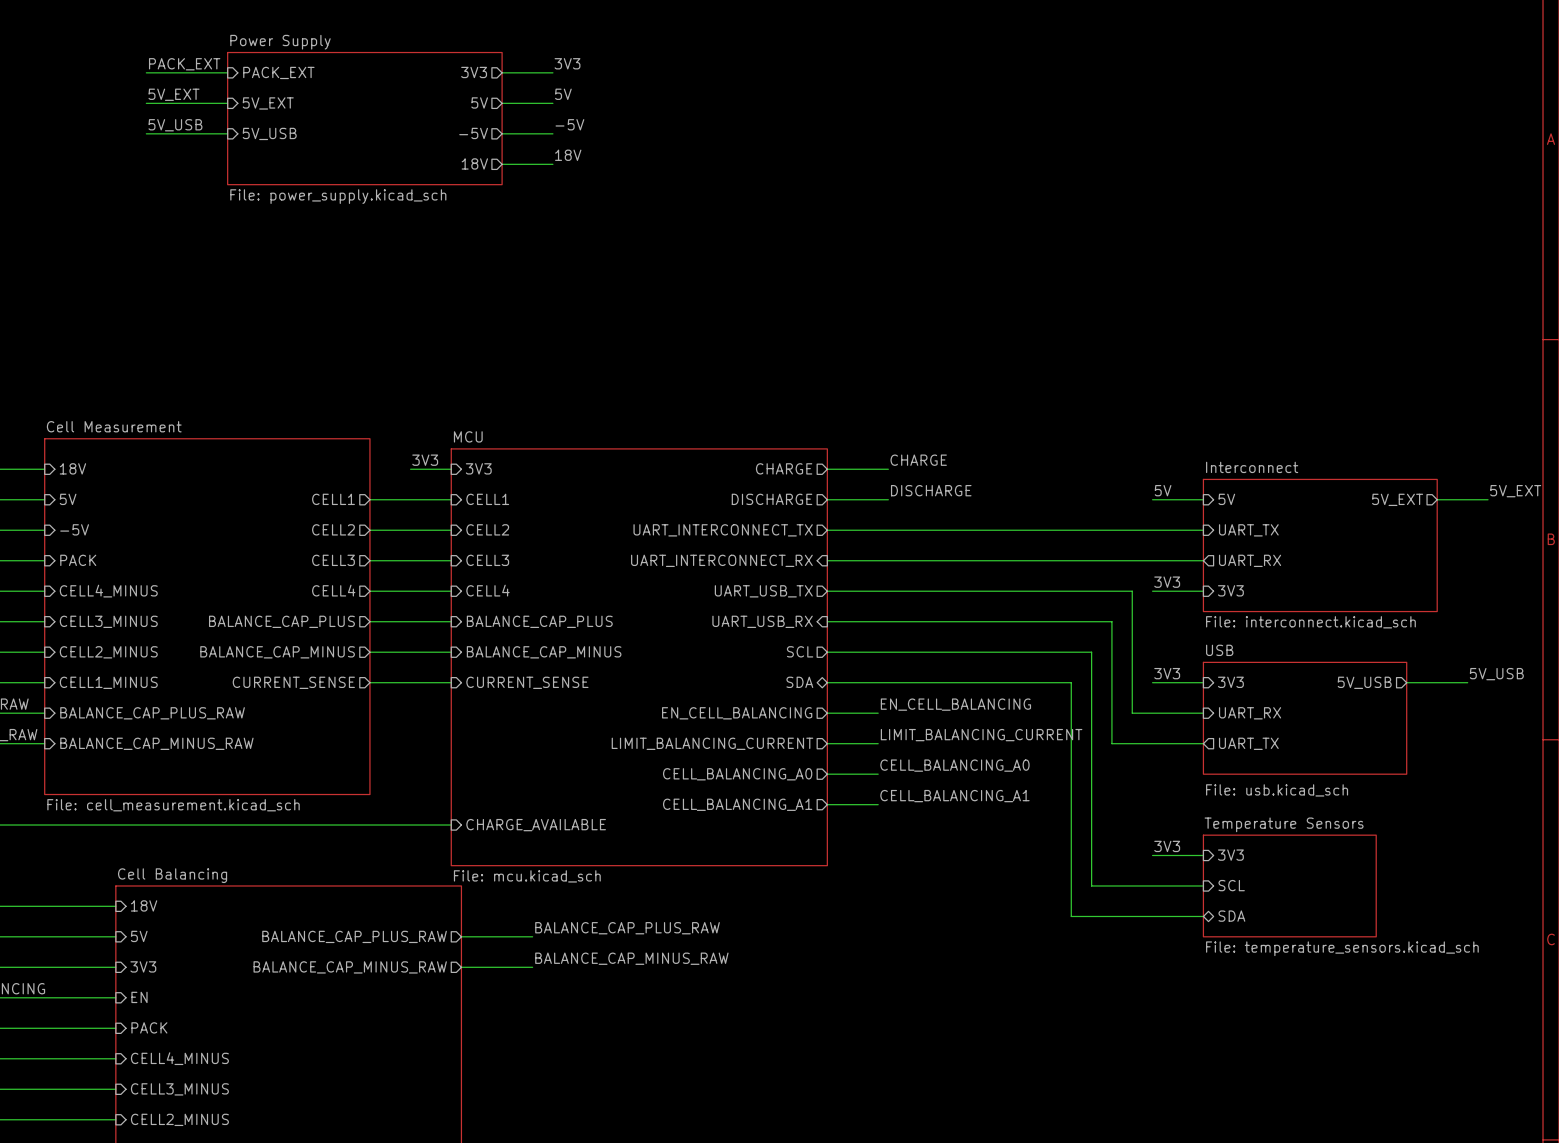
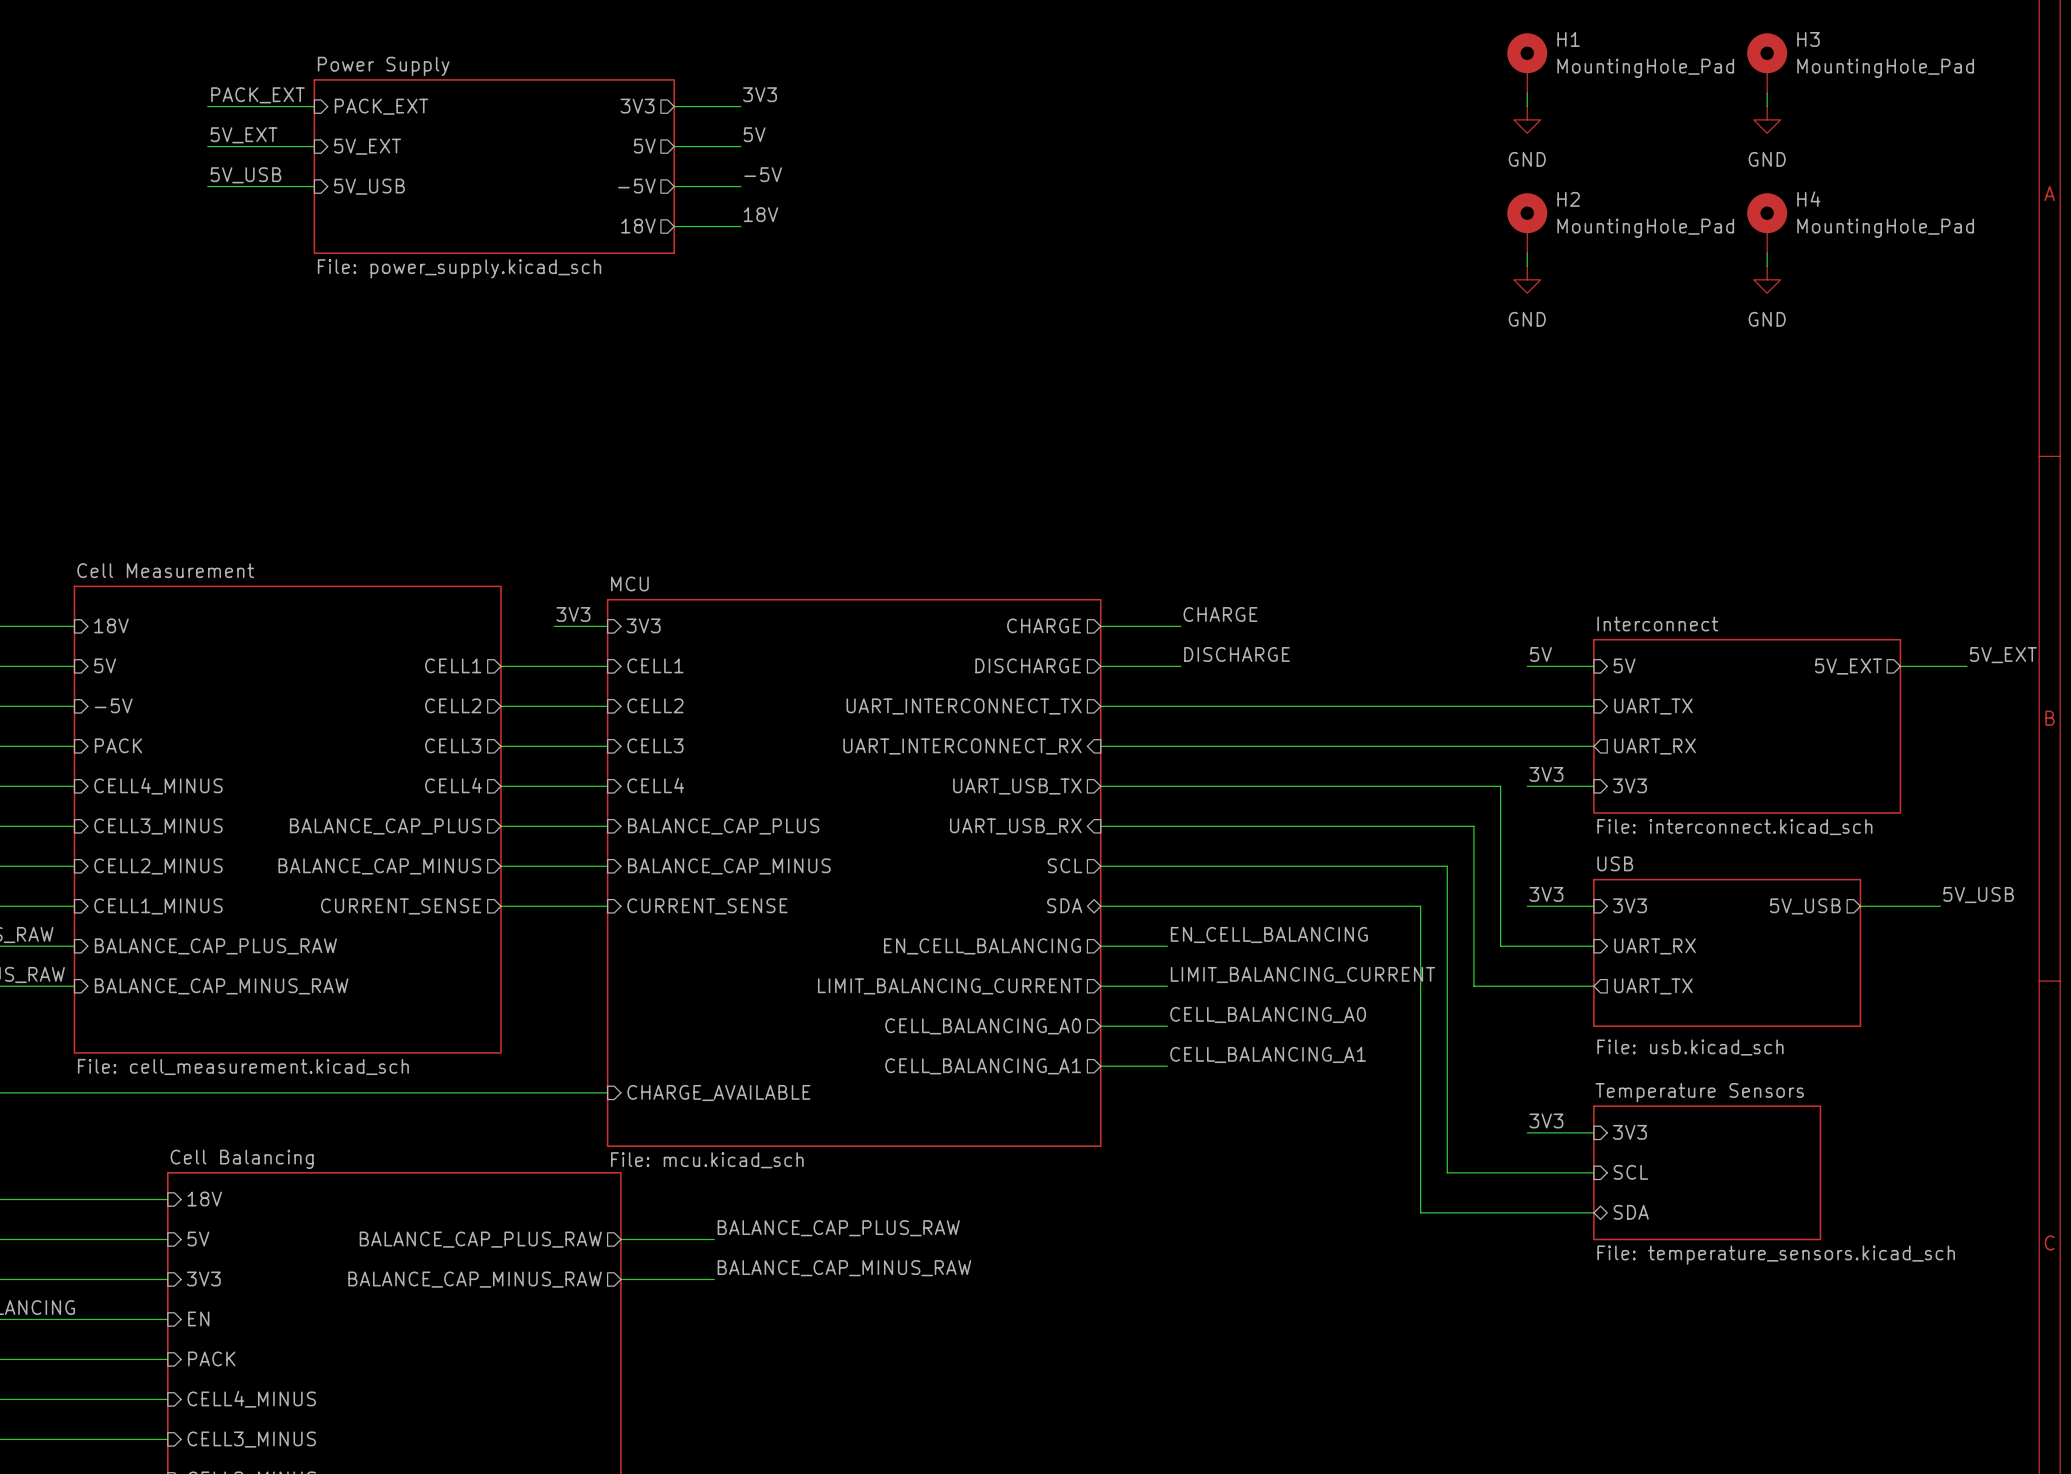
H1: none -> MountingHole_Pad (1527, 63)
H3: none -> MountingHole_Pad (1767, 63)
wire: none -> (1527, 93) (1527, 106)
wire: none -> (1767, 93) (1767, 106)
power symbol: none -> GND (1527, 119)
power symbol: none -> GND (1767, 119)
H2: none -> MountingHole_Pad (1527, 223)
H4: none -> MountingHole_Pad (1767, 223)
wire: none -> (1527, 253) (1527, 266)
wire: none -> (1767, 253) (1767, 266)
power symbol: none -> GND (1527, 279)
power symbol: none -> GND (1767, 279)

